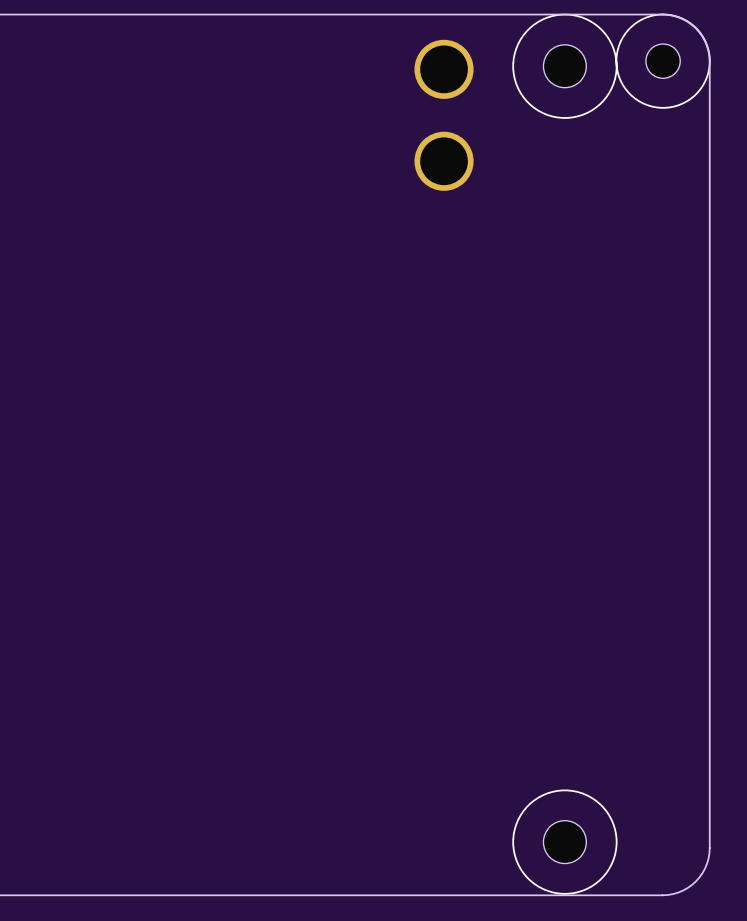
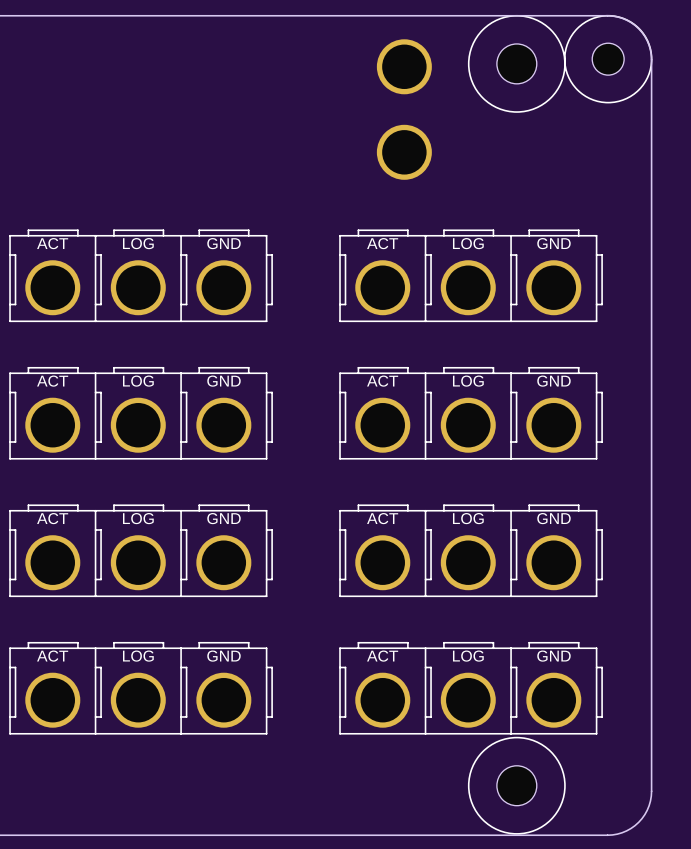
part: none -> (141, 275)
part: none -> (471, 275)
part: none -> (141, 413)
part: none -> (471, 413)
part: none -> (141, 550)
part: none -> (471, 550)
part: none -> (141, 688)
part: none -> (471, 688)

